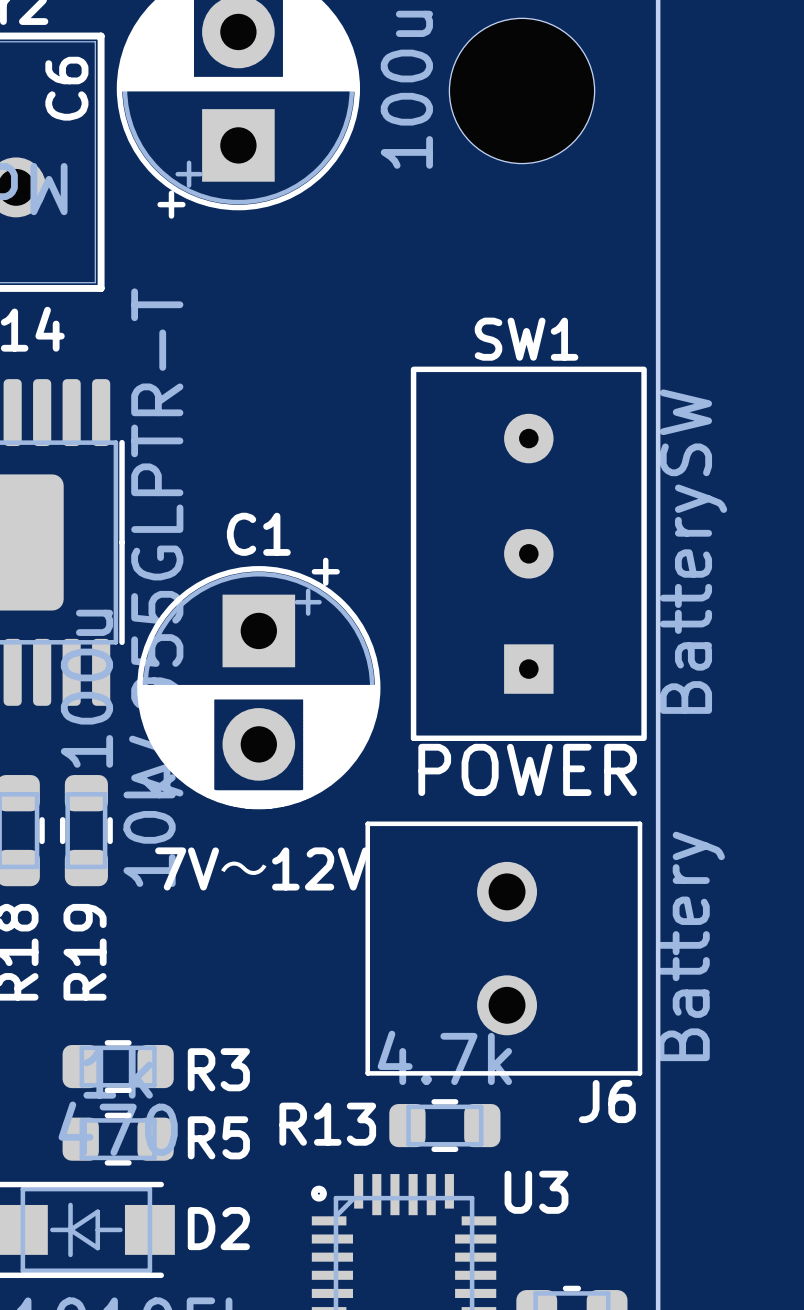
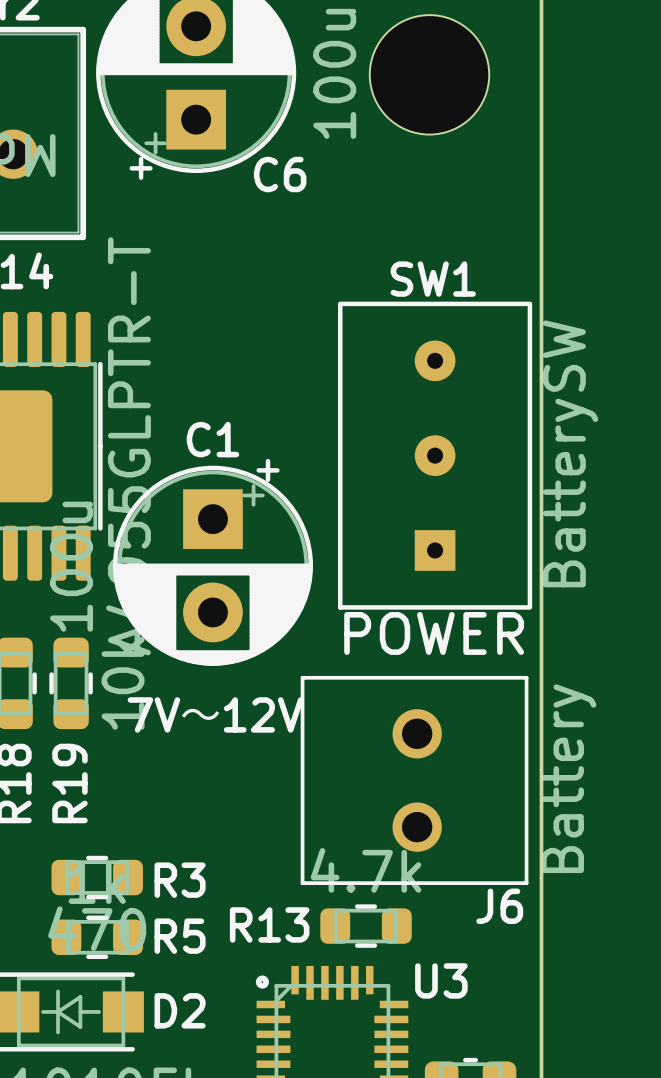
C6 name rotation: 0° (66, 88) -> 90° clockwise (280, 174)
C6 name position: C6 (66, 88) -> C6 (280, 174)

